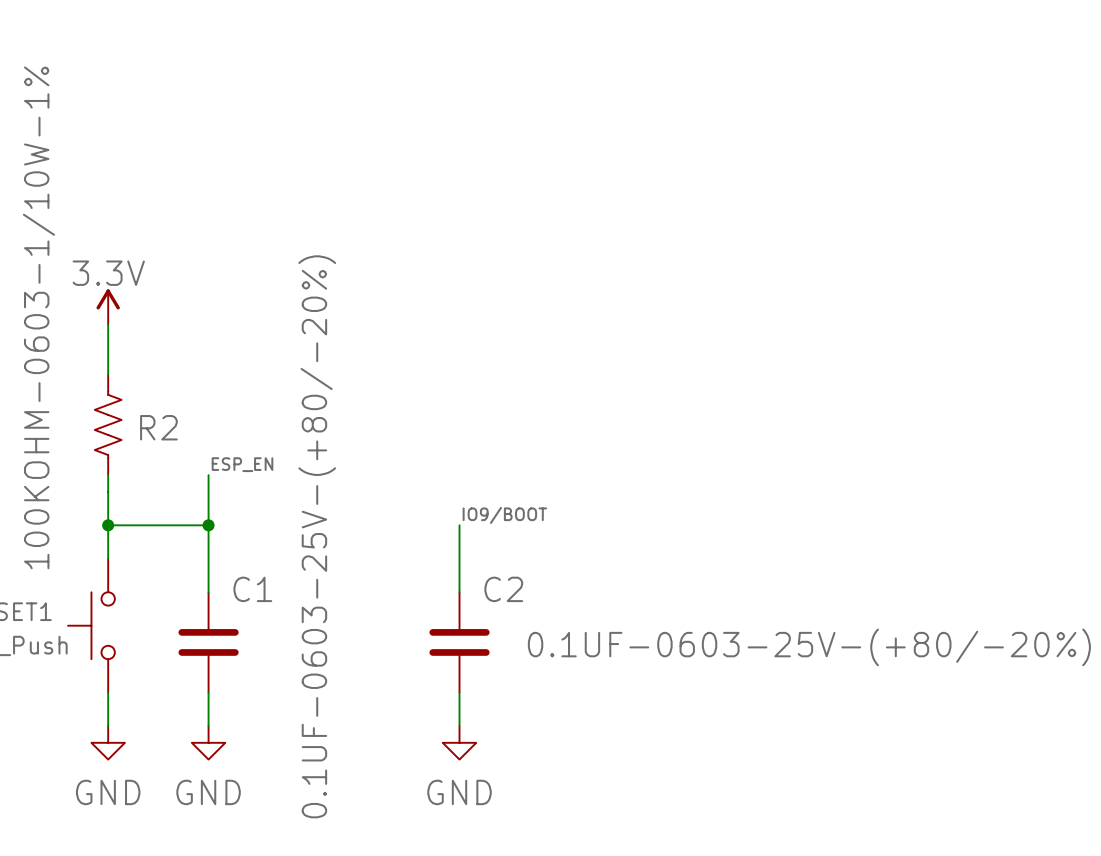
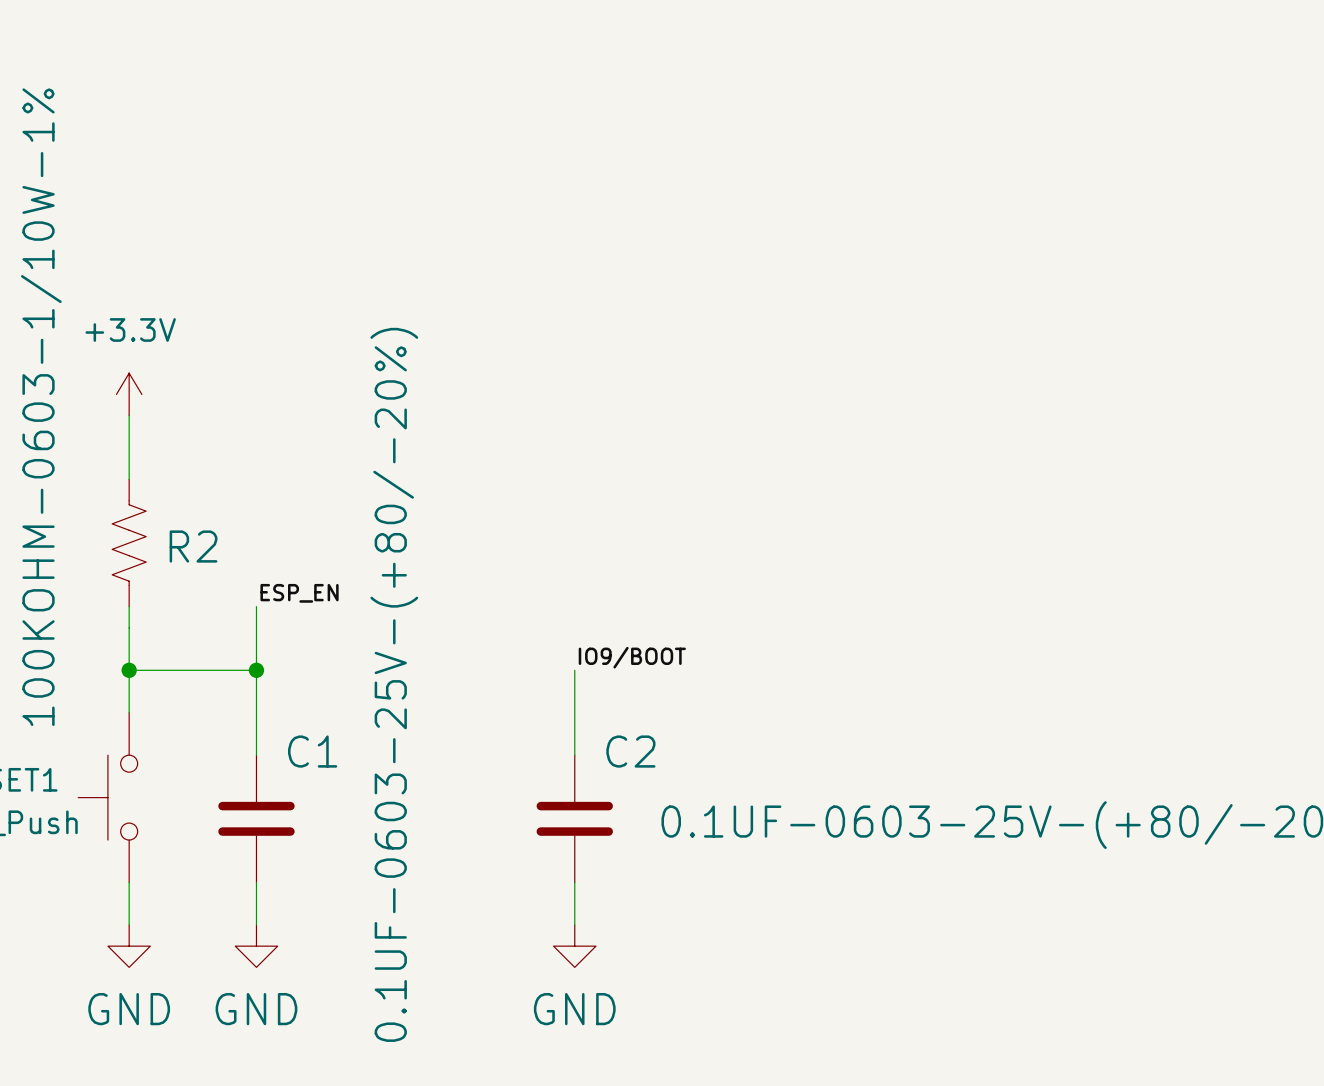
power symbol: 3.3V (108, 307) -> +3.3V (129, 394)

